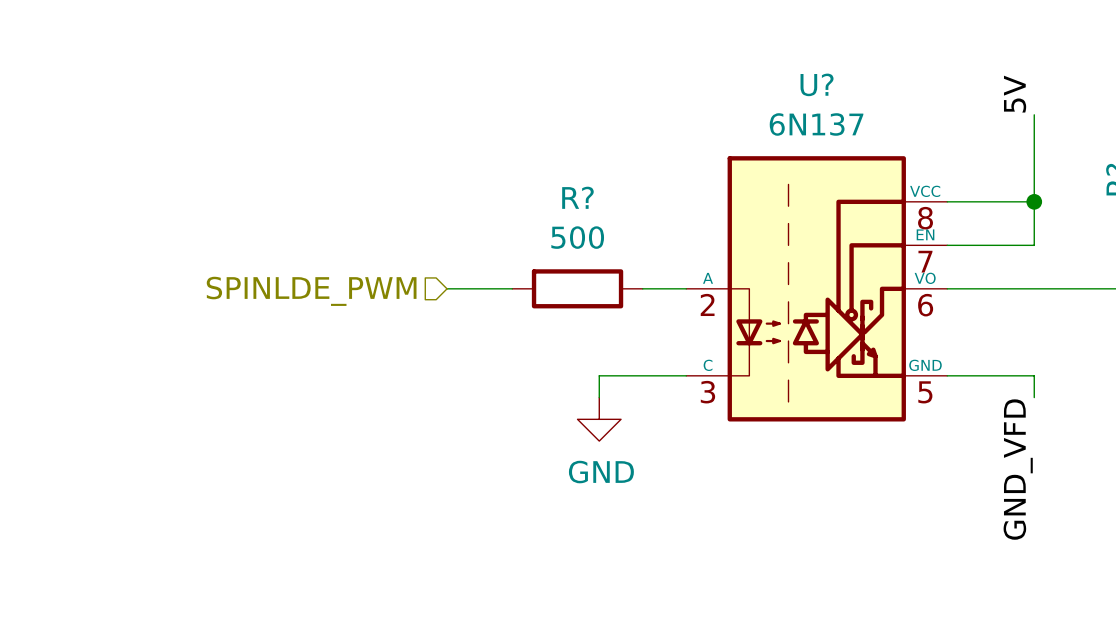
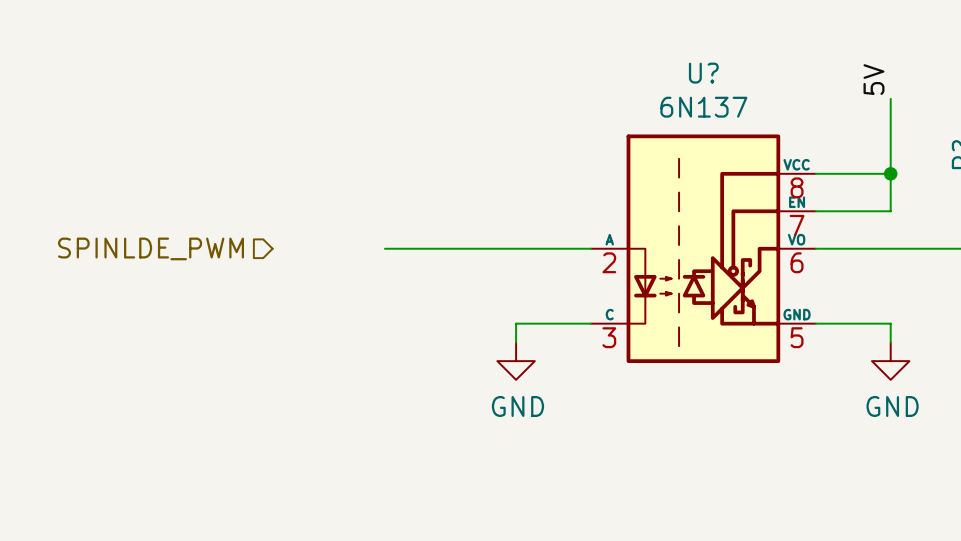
wire: none -> (441, 248) (553, 248)
R?: 500 (577, 288) -> none
hierarchical label position: SPINLDE_PWM (311, 291) -> SPINLDE_PWM (151, 248)
power symbol: none -> GND (890, 361)
label: GND_VFD (1018, 469) -> none

